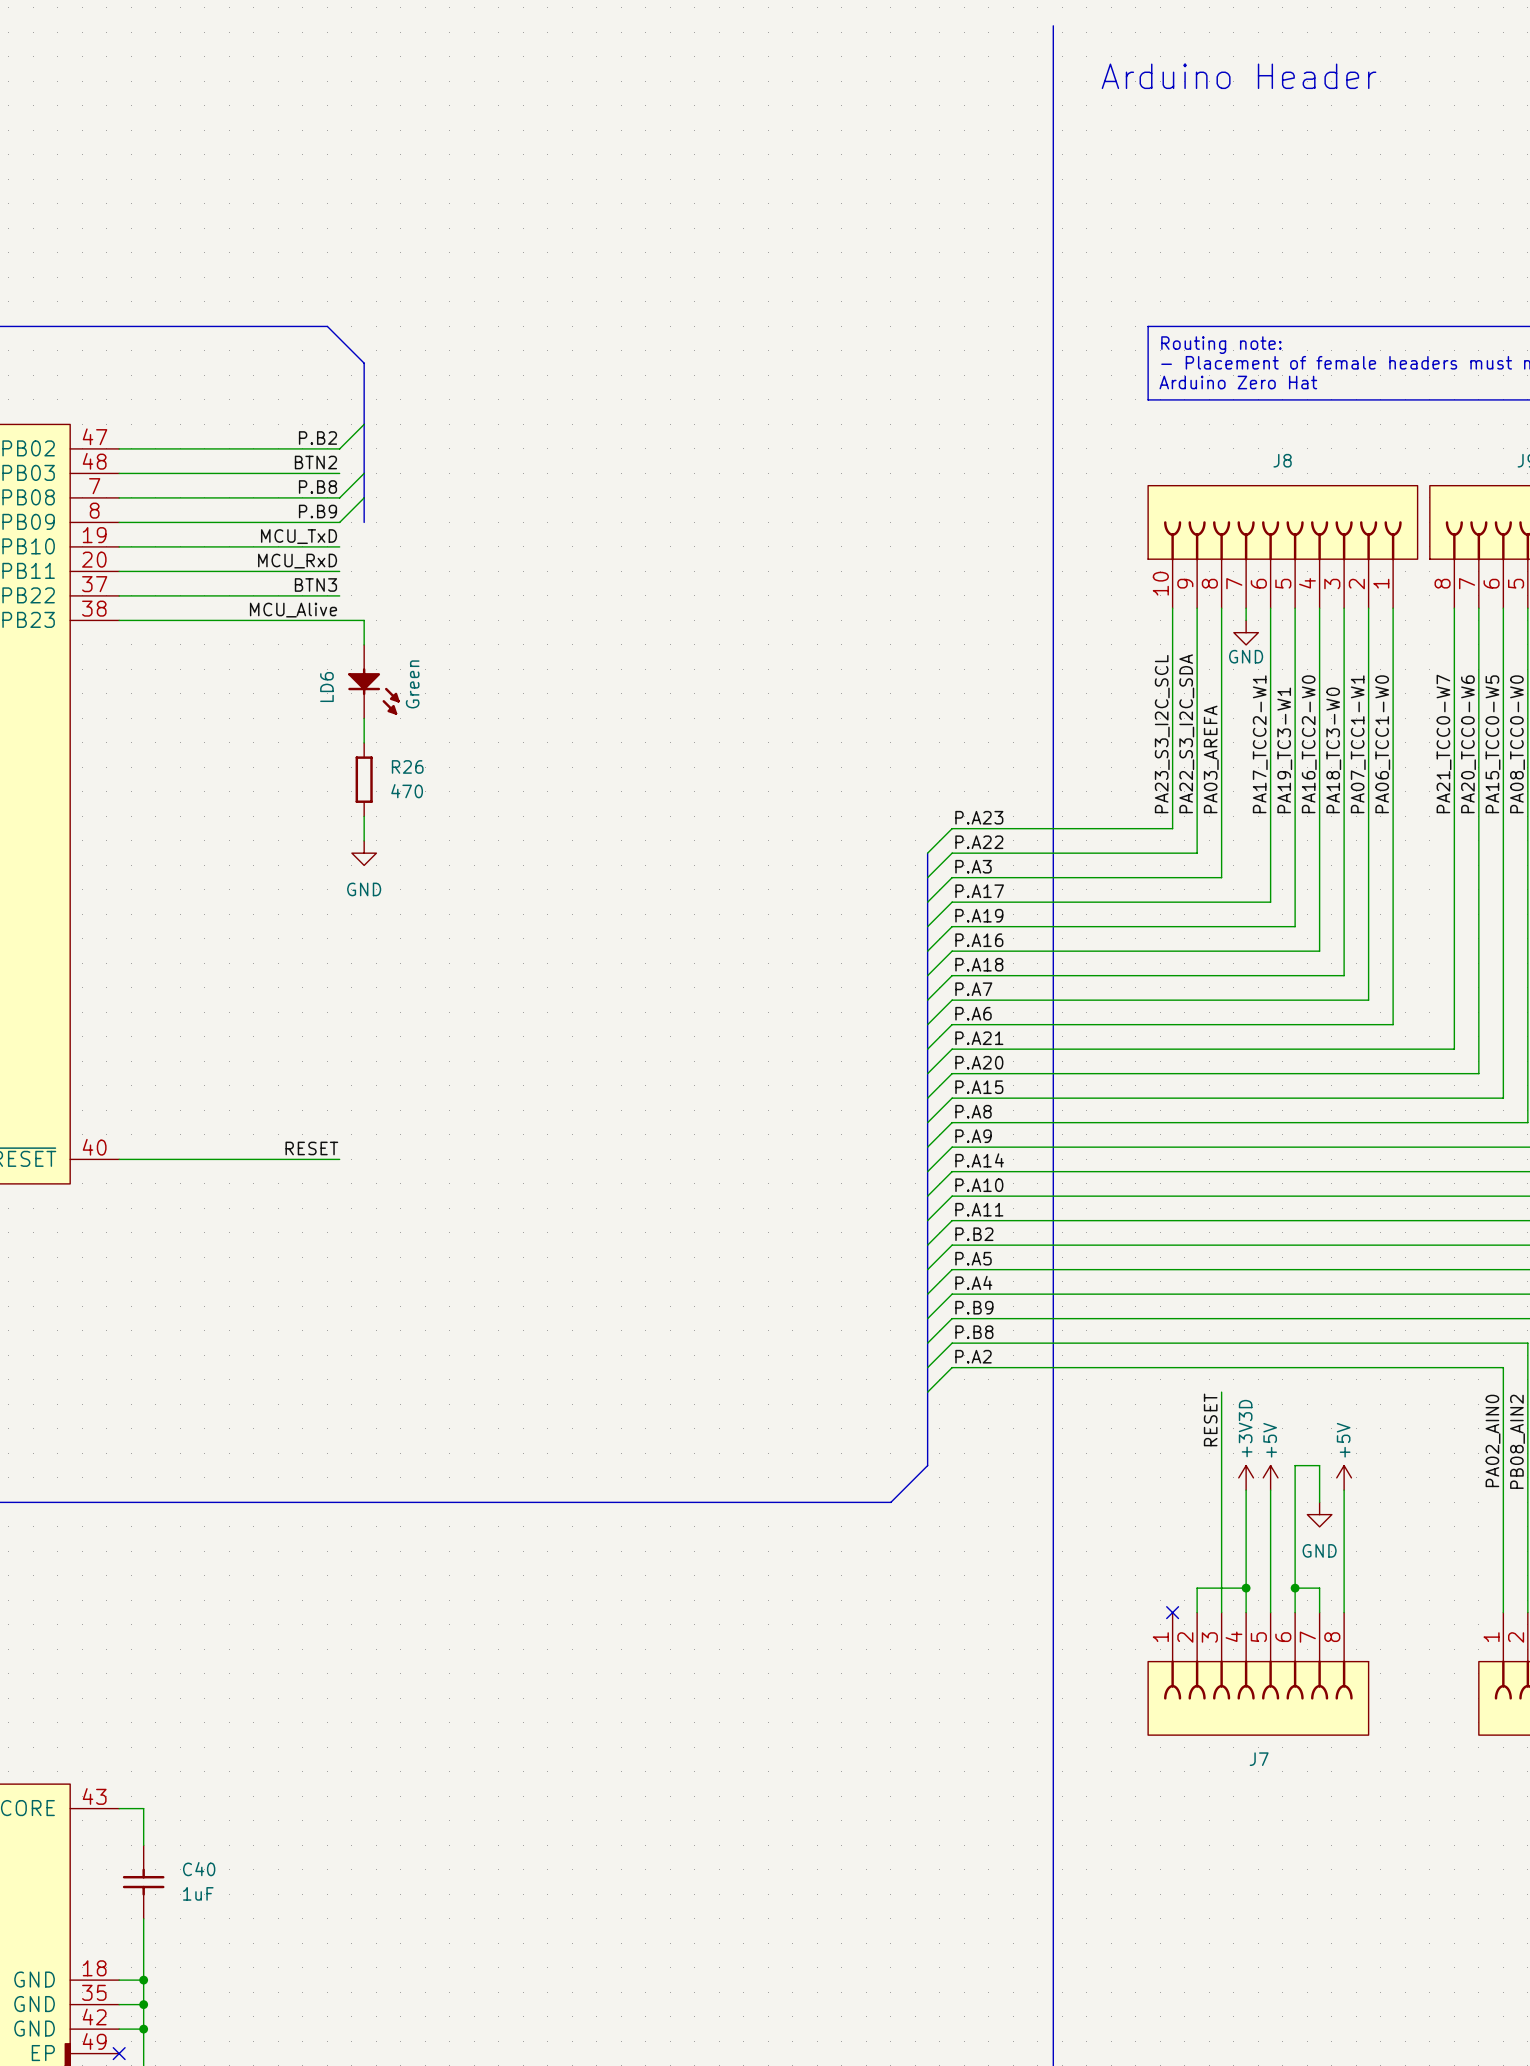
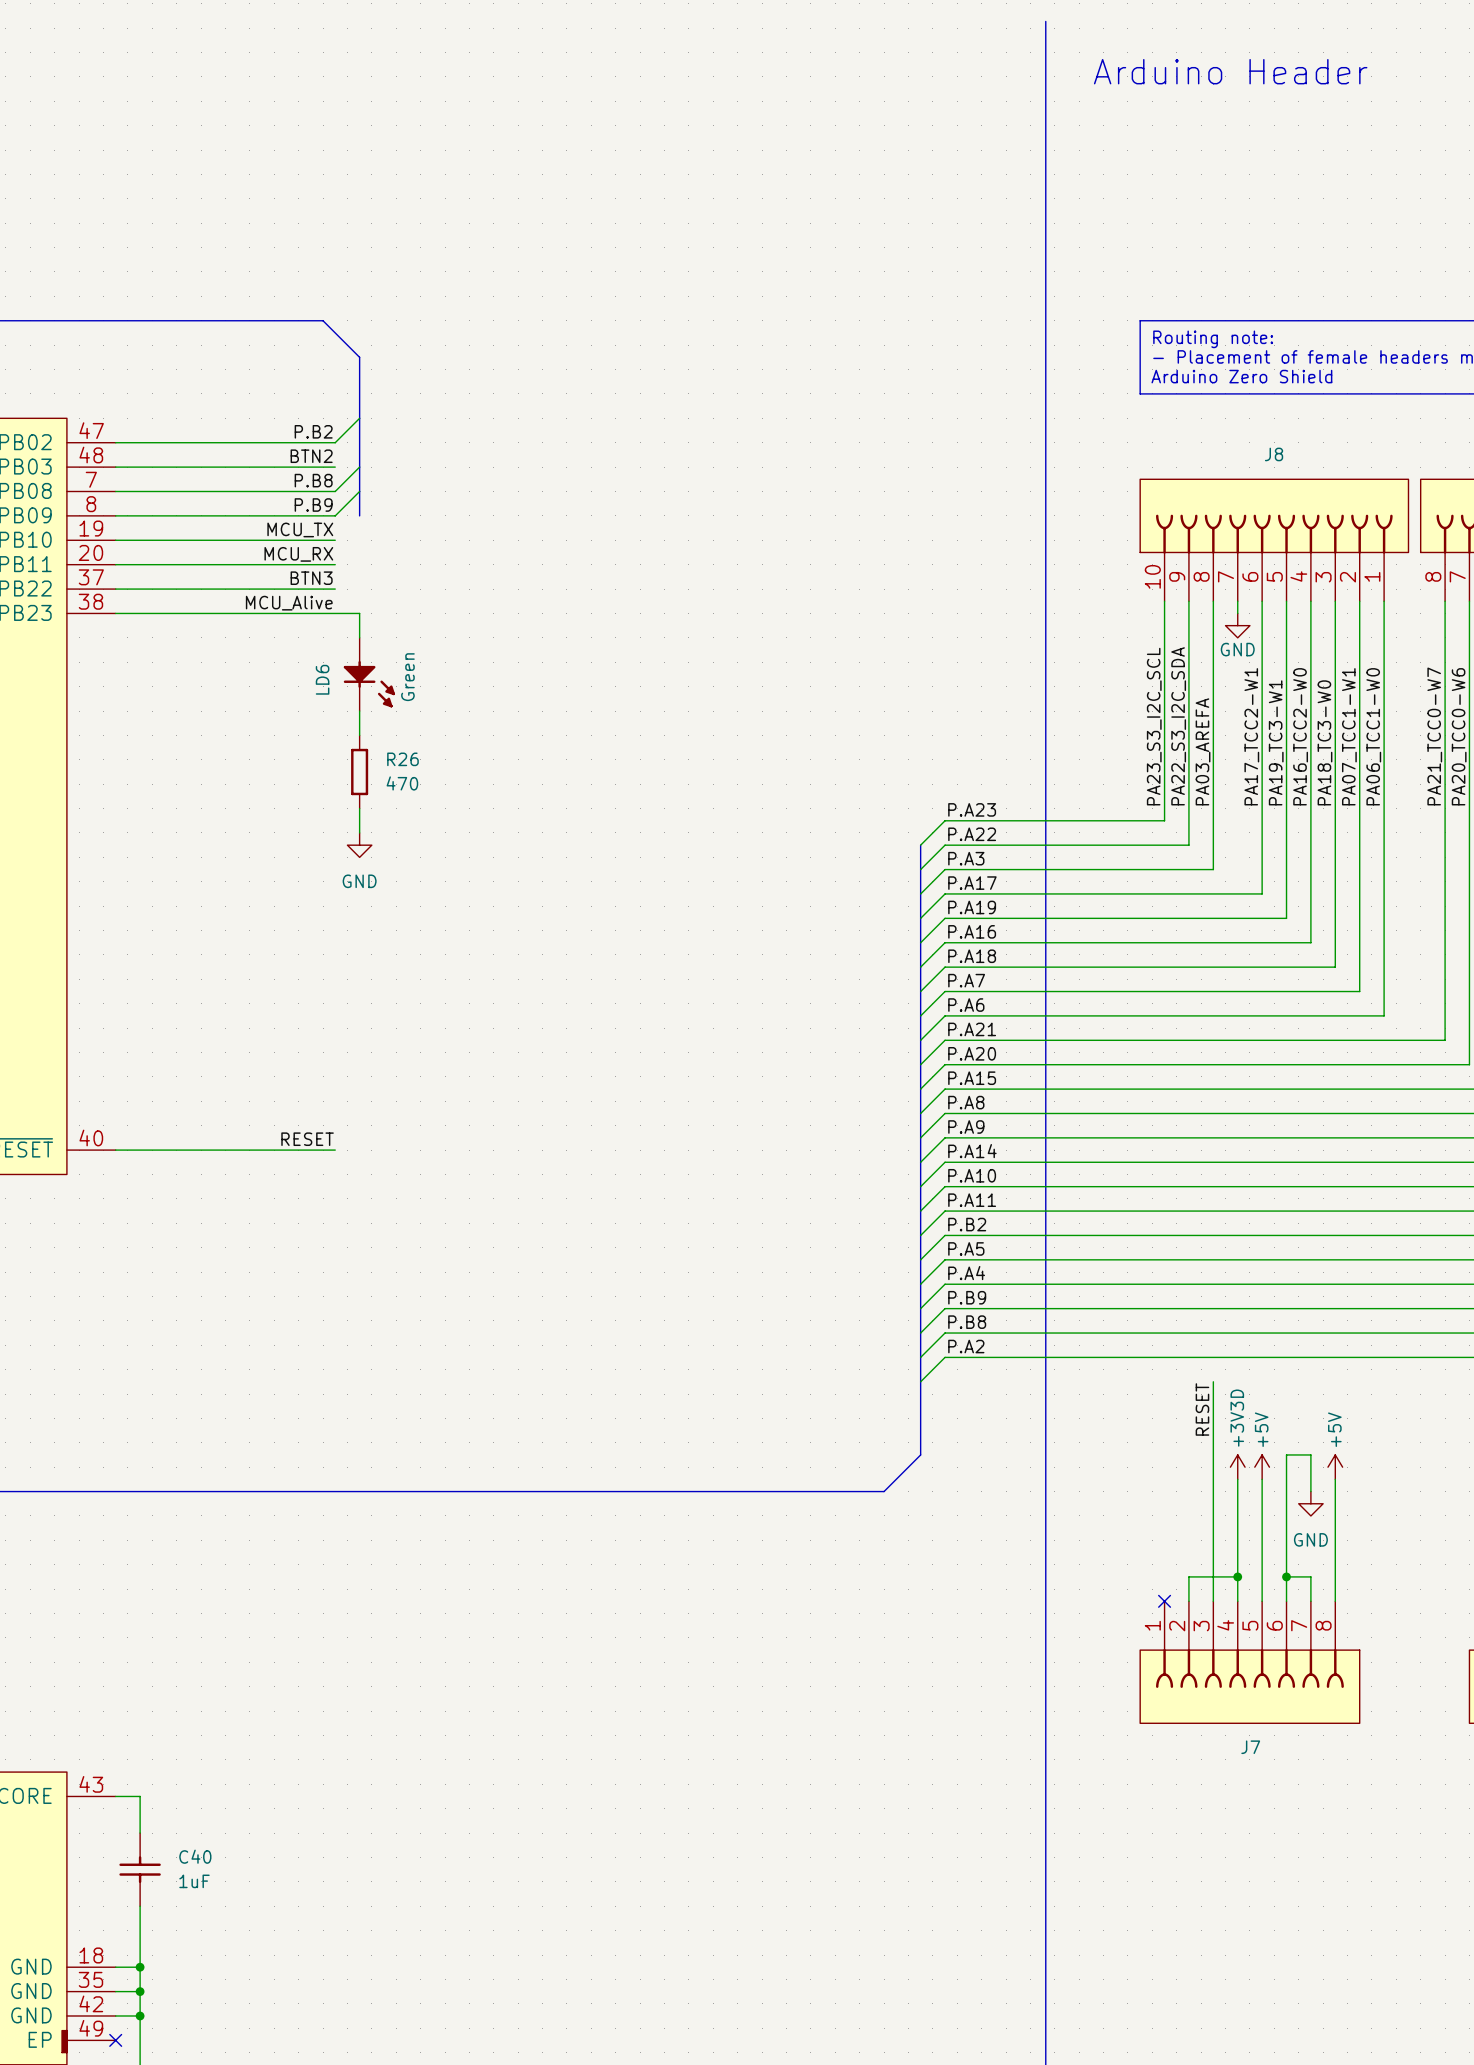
text: Arduino Zero Hat (1238, 382) -> Arduino Zero Shield (1241, 376)
label: MCU_TxD (299, 536) -> MCU_TX (300, 529)
label: MCU_RxD (297, 561) -> MCU_RX (298, 554)

